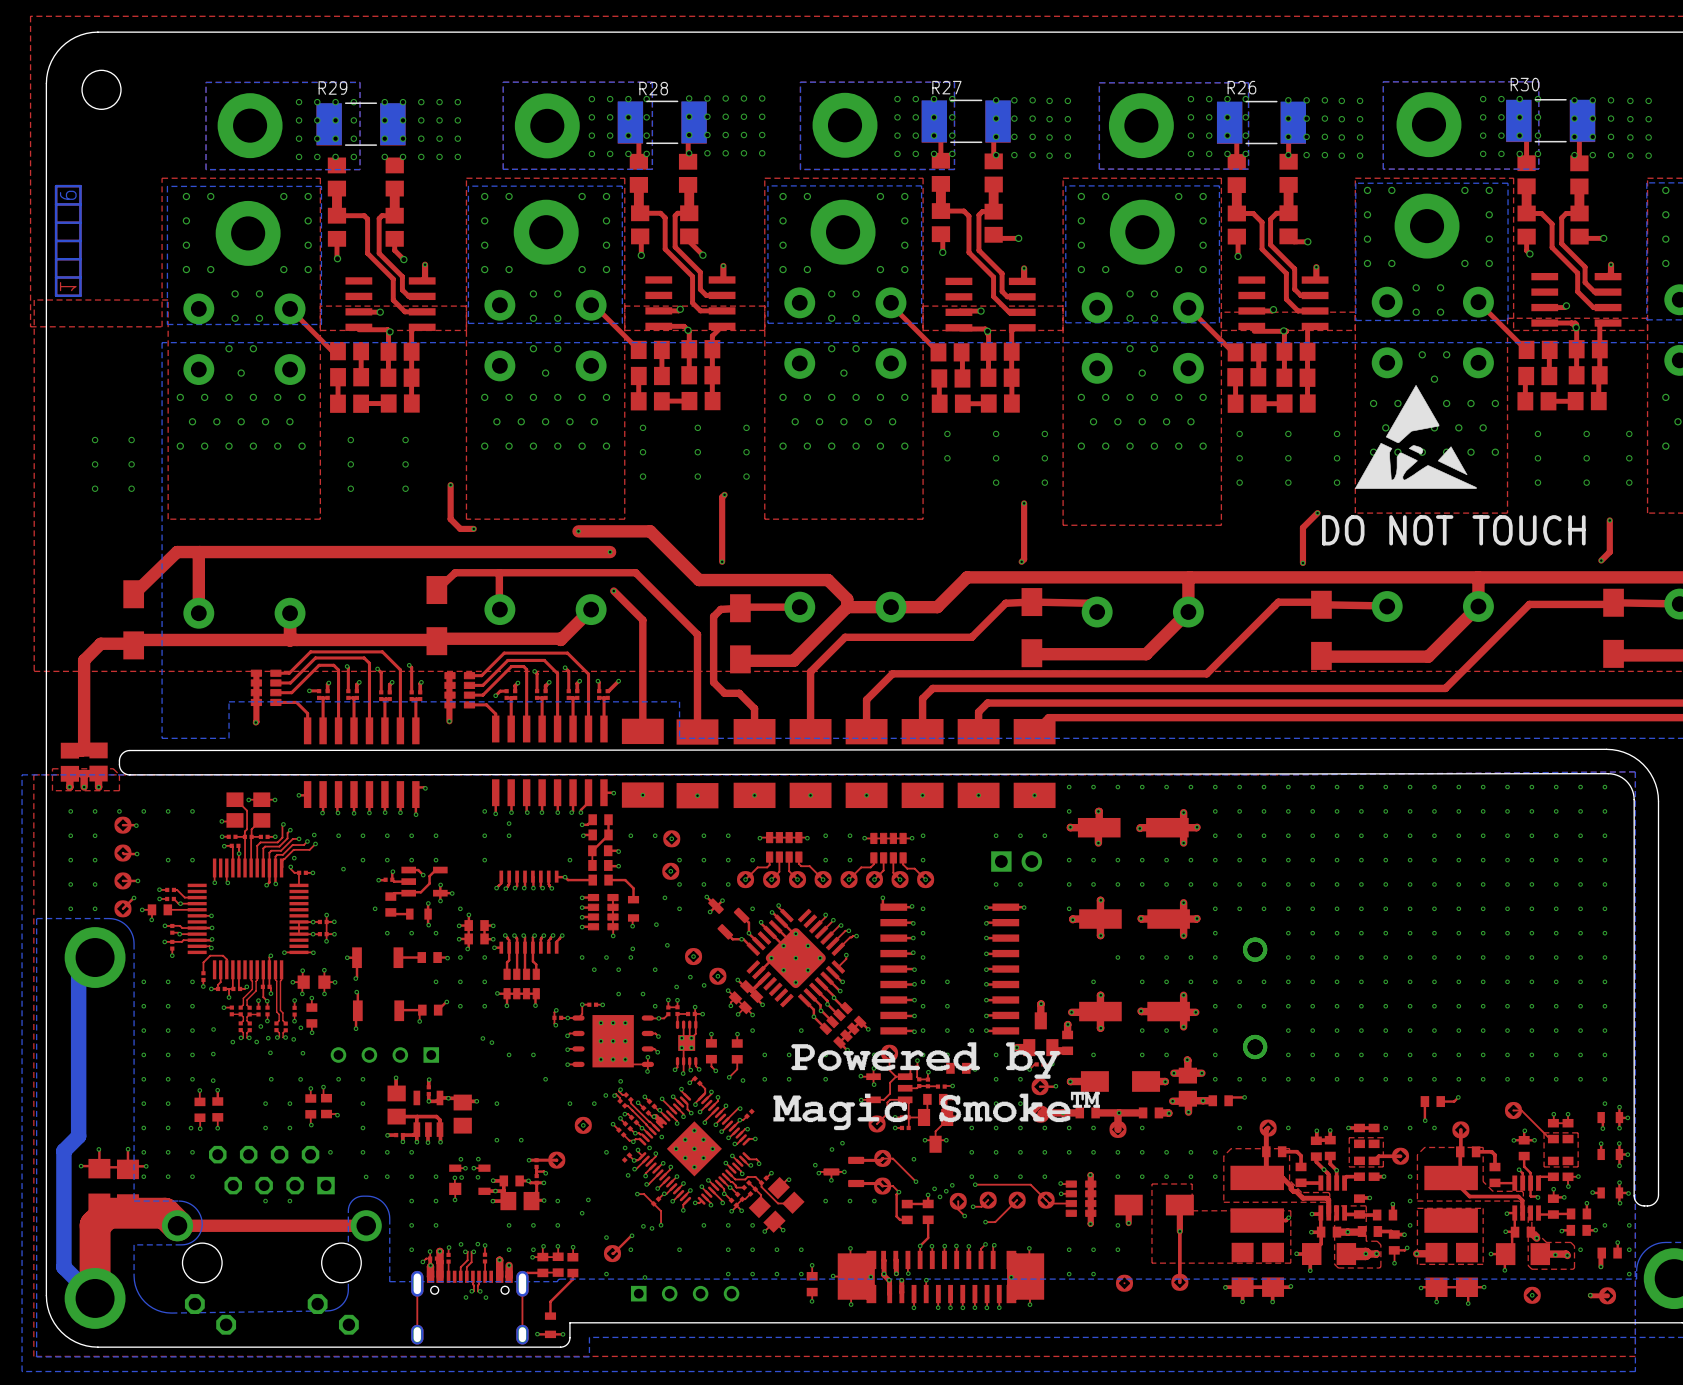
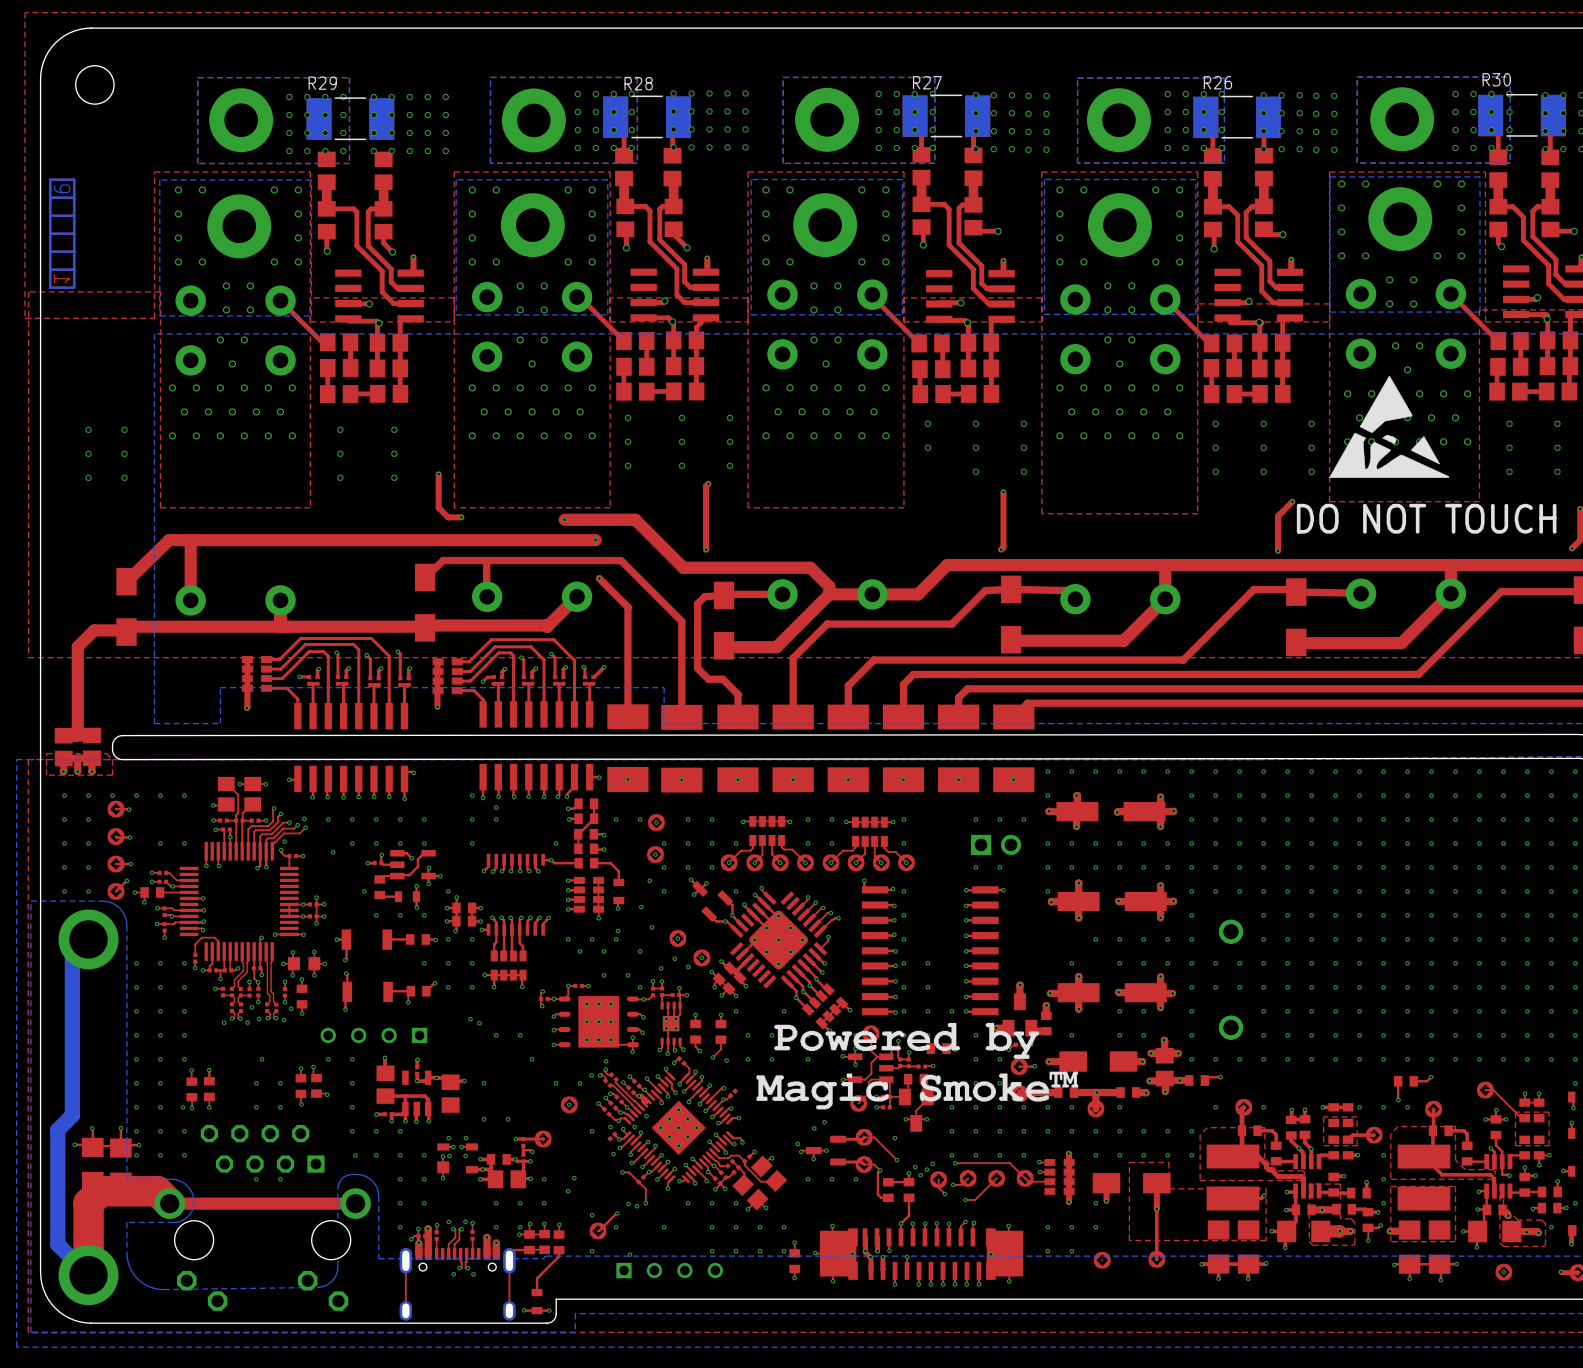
via: (213, 1029) -> none
via: (270, 1052) -> none
via: (302, 1053) -> none
via: (213, 1054) -> none
via: (300, 1079) -> none
via: (213, 1080) -> none
via: (330, 1152) -> none

